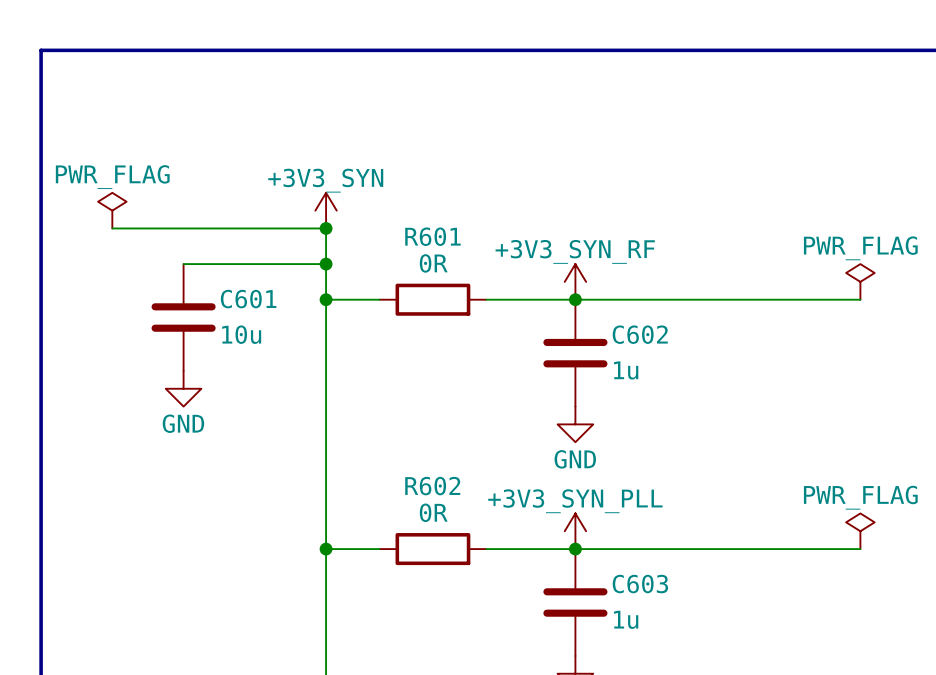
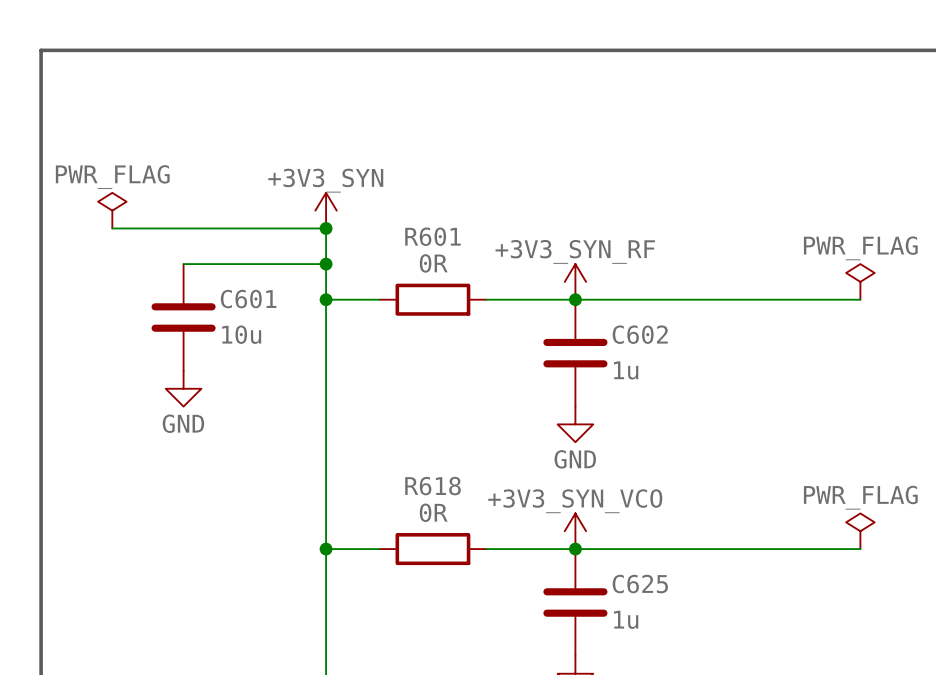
R602 name: R602 (432, 486) -> R618 (433, 486)
power symbol: +3V3_SYN_PLL (575, 531) -> +3V3_SYN_VCO (575, 531)
C603 name: C603 (640, 584) -> C625 (640, 584)

